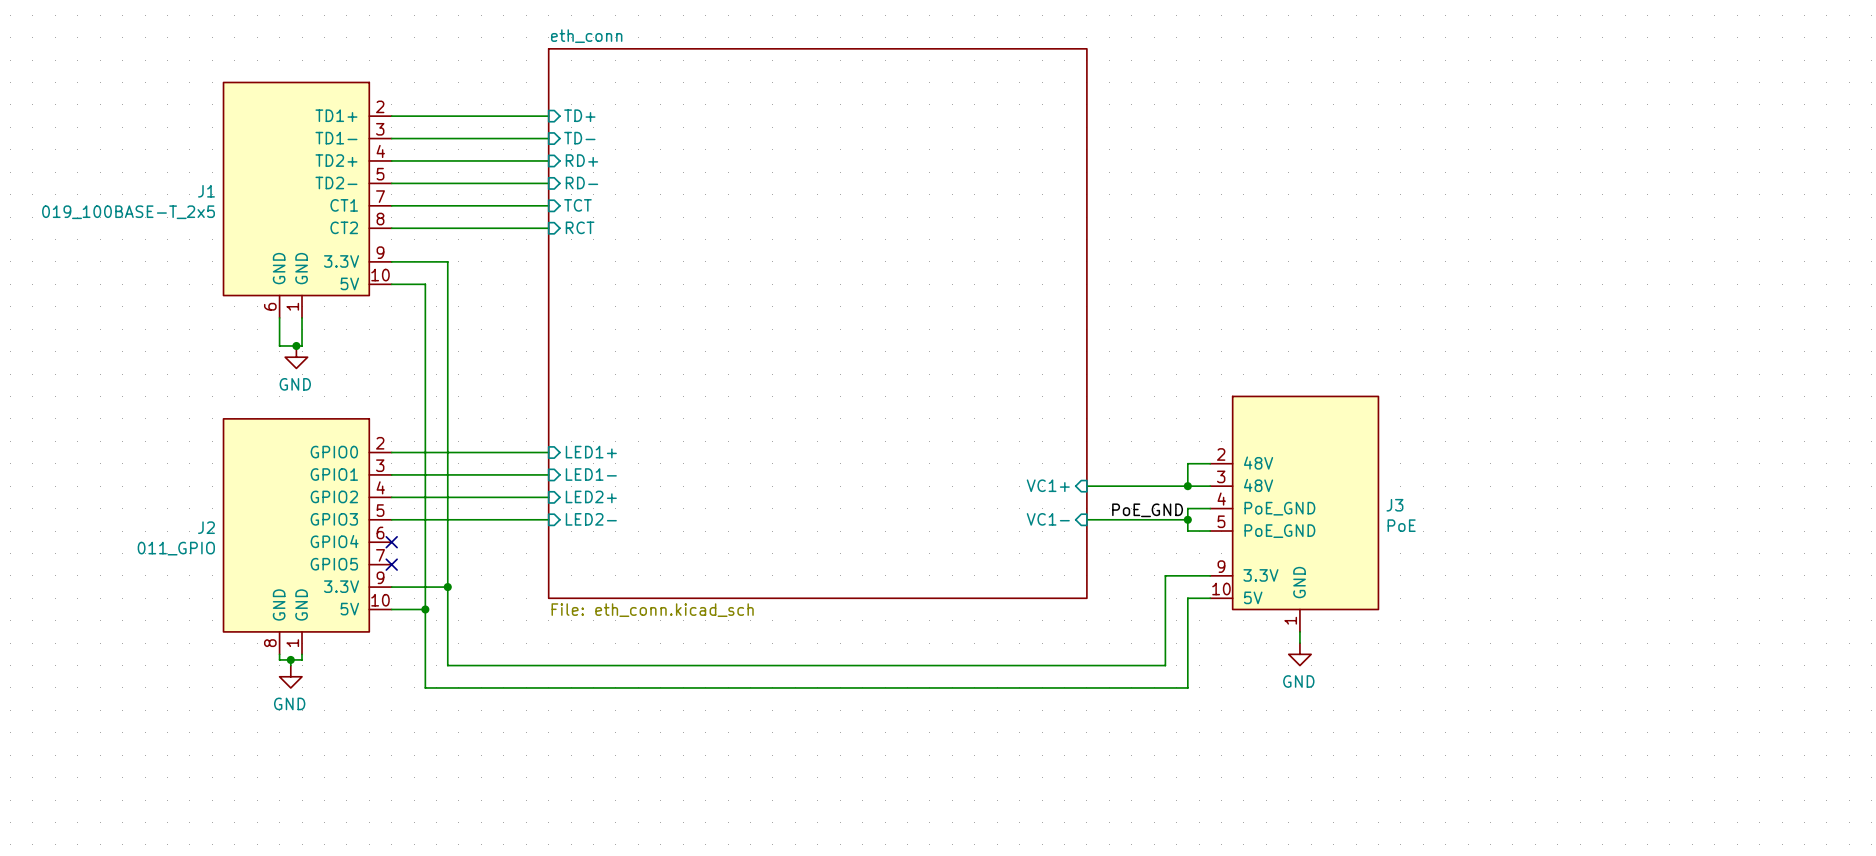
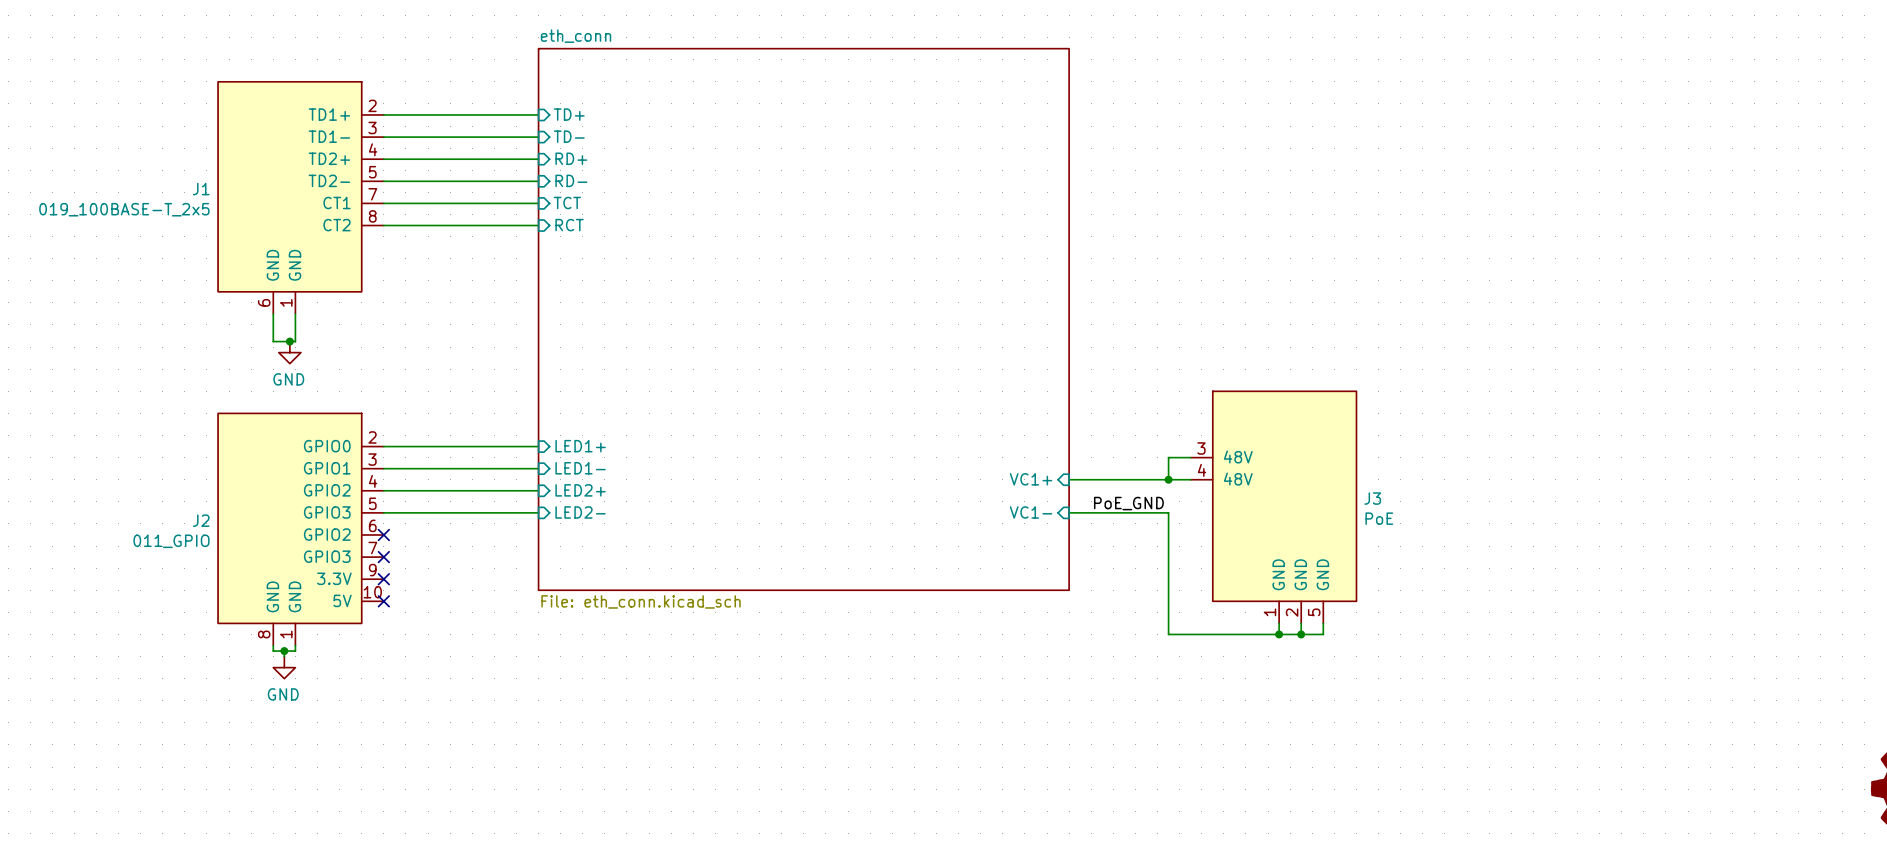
J1 symbol: [223, 82, 392, 318] -> [218, 81, 384, 314]
wire: (391, 261) (447, 261) (447, 665) (1165, 665) (1165, 575) (1210, 575) -> none
wire: (391, 284) (425, 284) (425, 687) (1187, 687) (1187, 643) -> (1323, 623) (1323, 634) (1168, 634)
J3 symbol: [1210, 396, 1379, 632] -> [1190, 391, 1357, 624]
wire: (1210, 508) (1187, 508) (1187, 519) -> none
junction: (1187, 519) -> none
wire: (1187, 531) (1210, 531) -> (1168, 523) (1168, 590)
J2 pin name: GPIO4 (334, 541) -> GPIO2 (327, 534)
J2 pin name: GPIO5 (334, 564) -> GPIO3 (327, 556)
wire: (391, 587) (447, 587) -> none
no-connect mark: none -> (383, 579)
junction: (447, 587) -> none
wire: (1187, 598) (1210, 598) -> none
wire: (391, 609) (425, 609) -> none
no-connect mark: none -> (383, 601)
junction: (425, 609) -> none
wire: none -> (1301, 623) (1301, 634)
junction: none -> (1279, 634)
junction: none -> (1301, 634)
power symbol: GND (1299, 654) -> none

